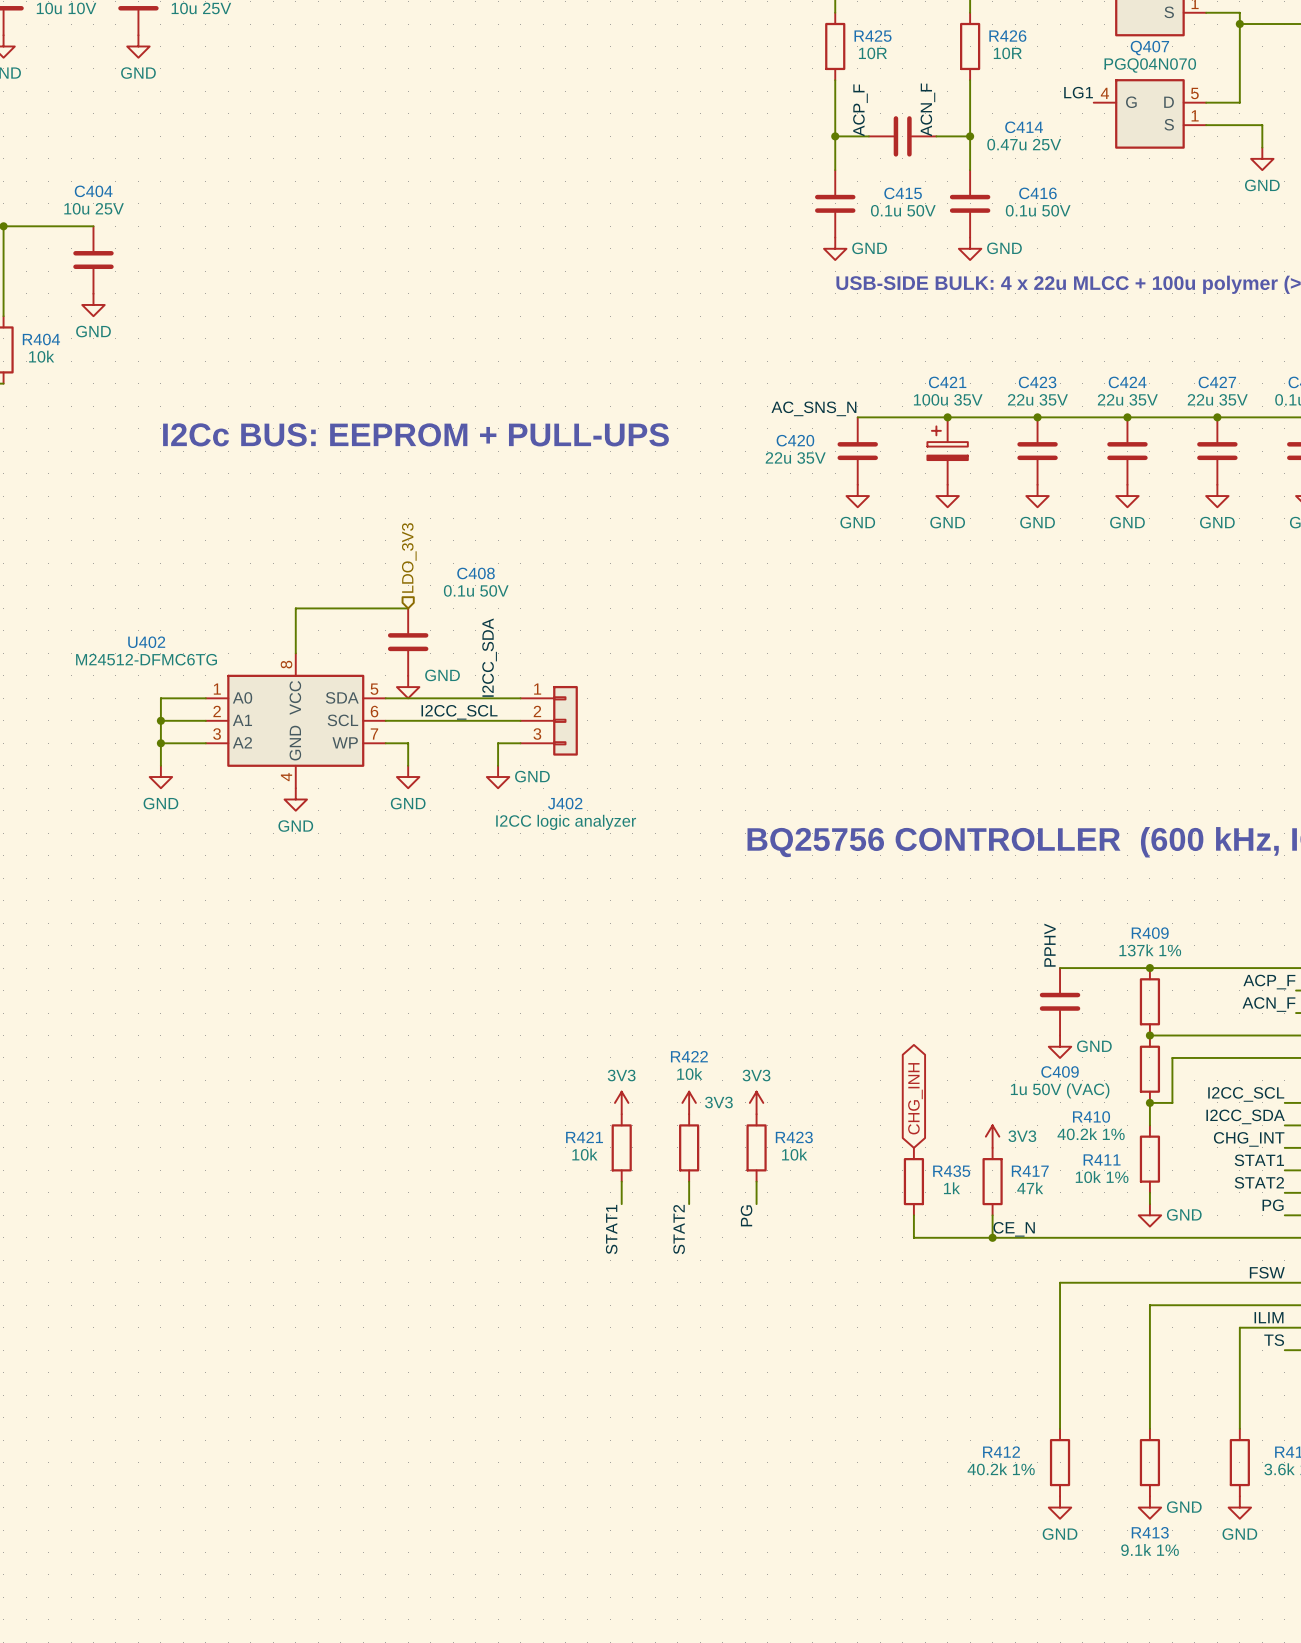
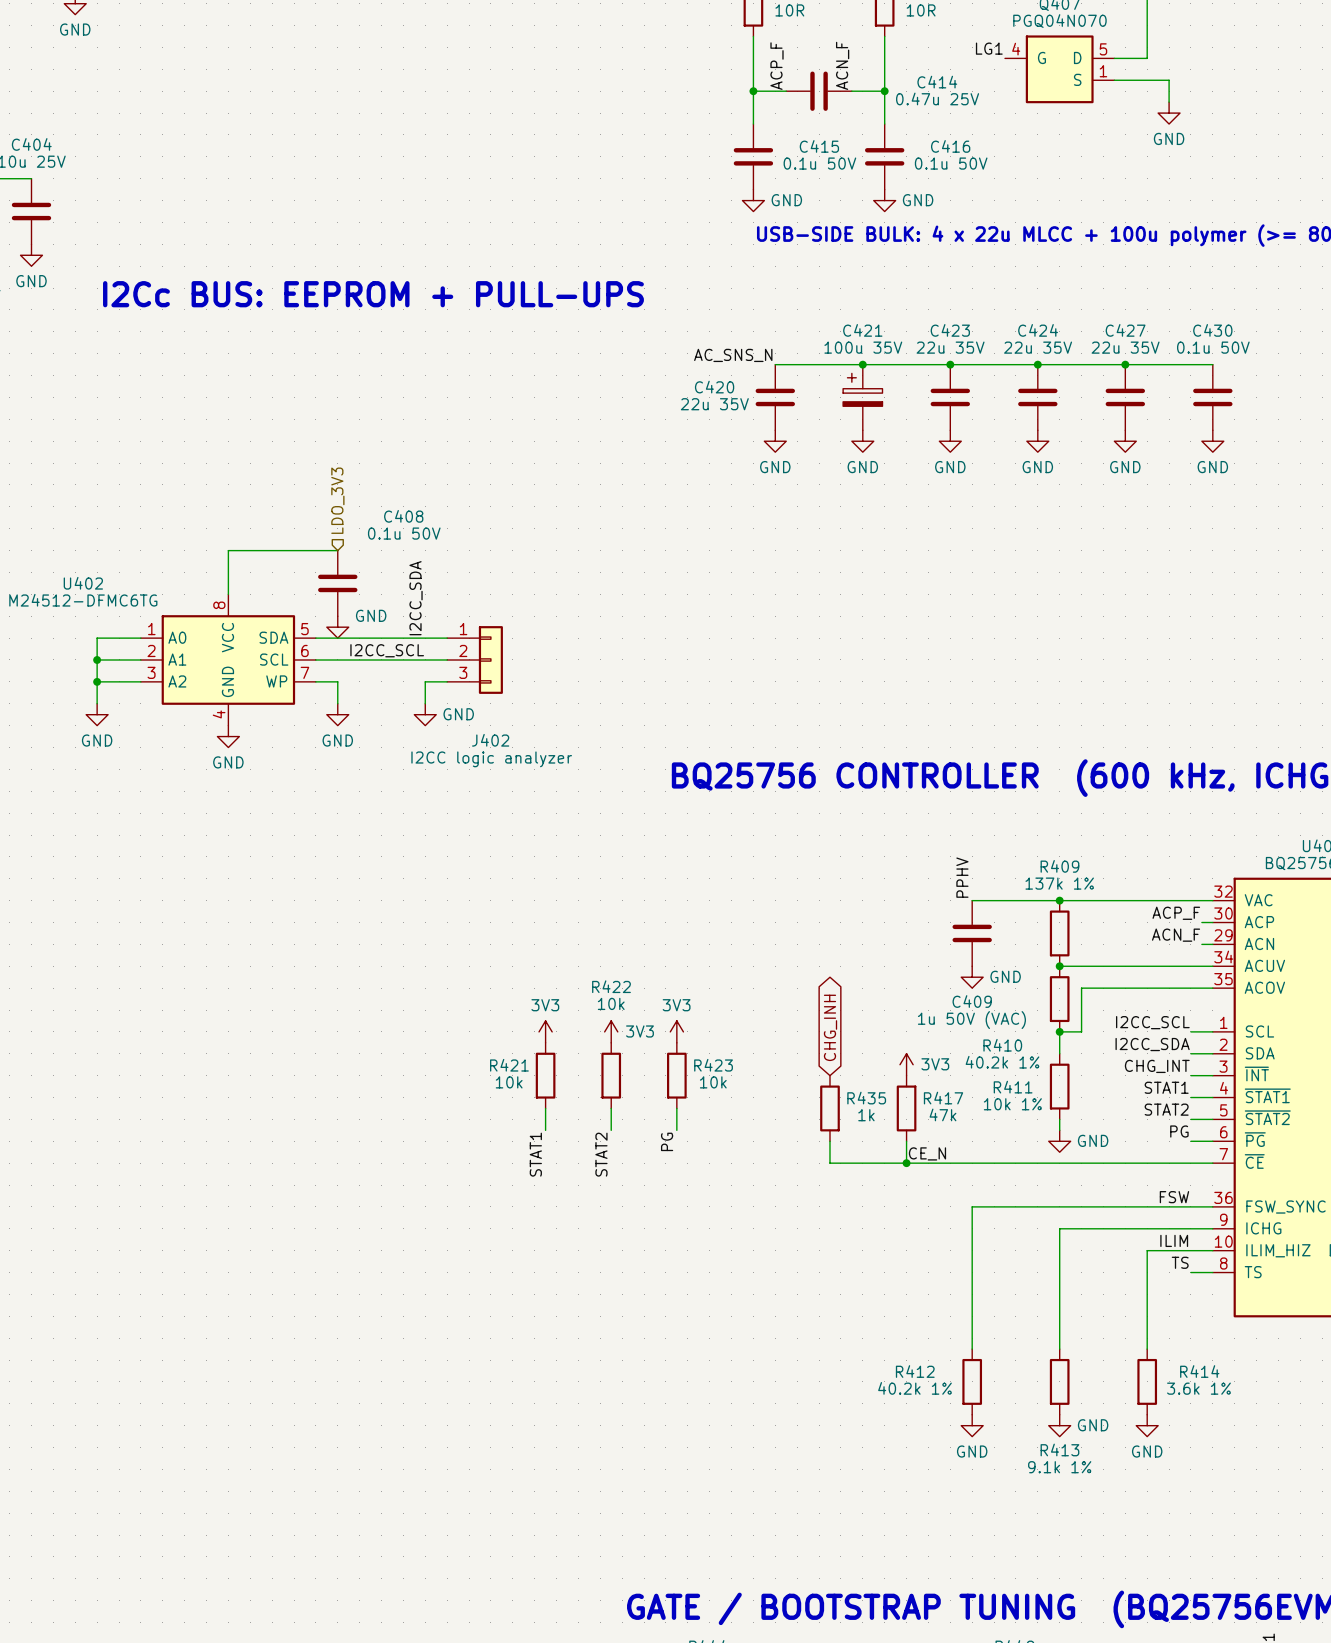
text position: I2Cc BUS: EEPROM + PULL-UPS (415, 434) -> I2Cc BUS: EEPROM + PULL-UPS (373, 294)

